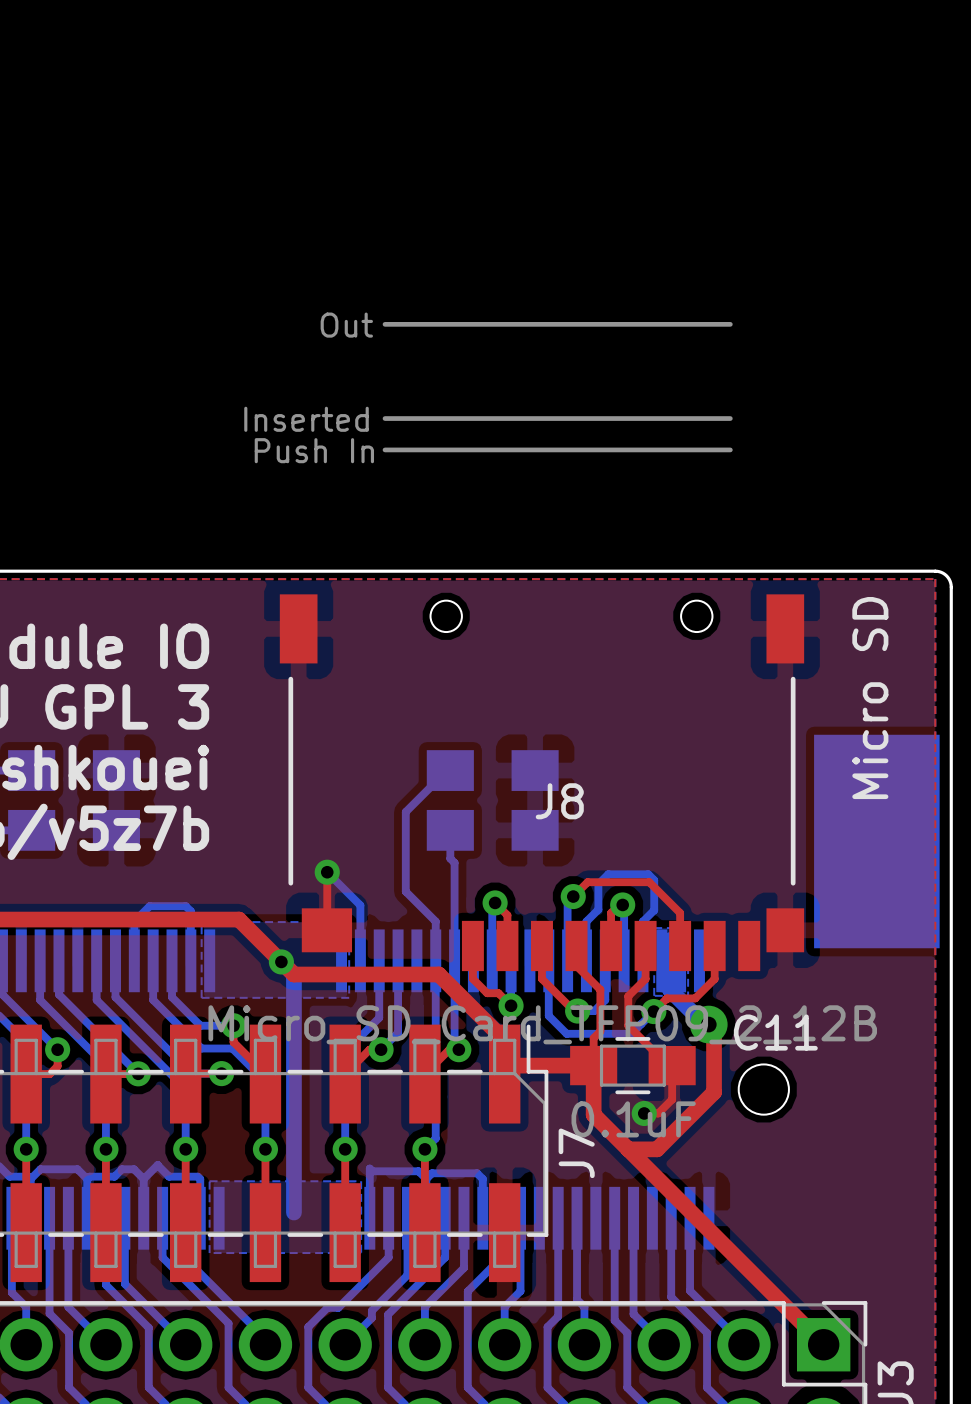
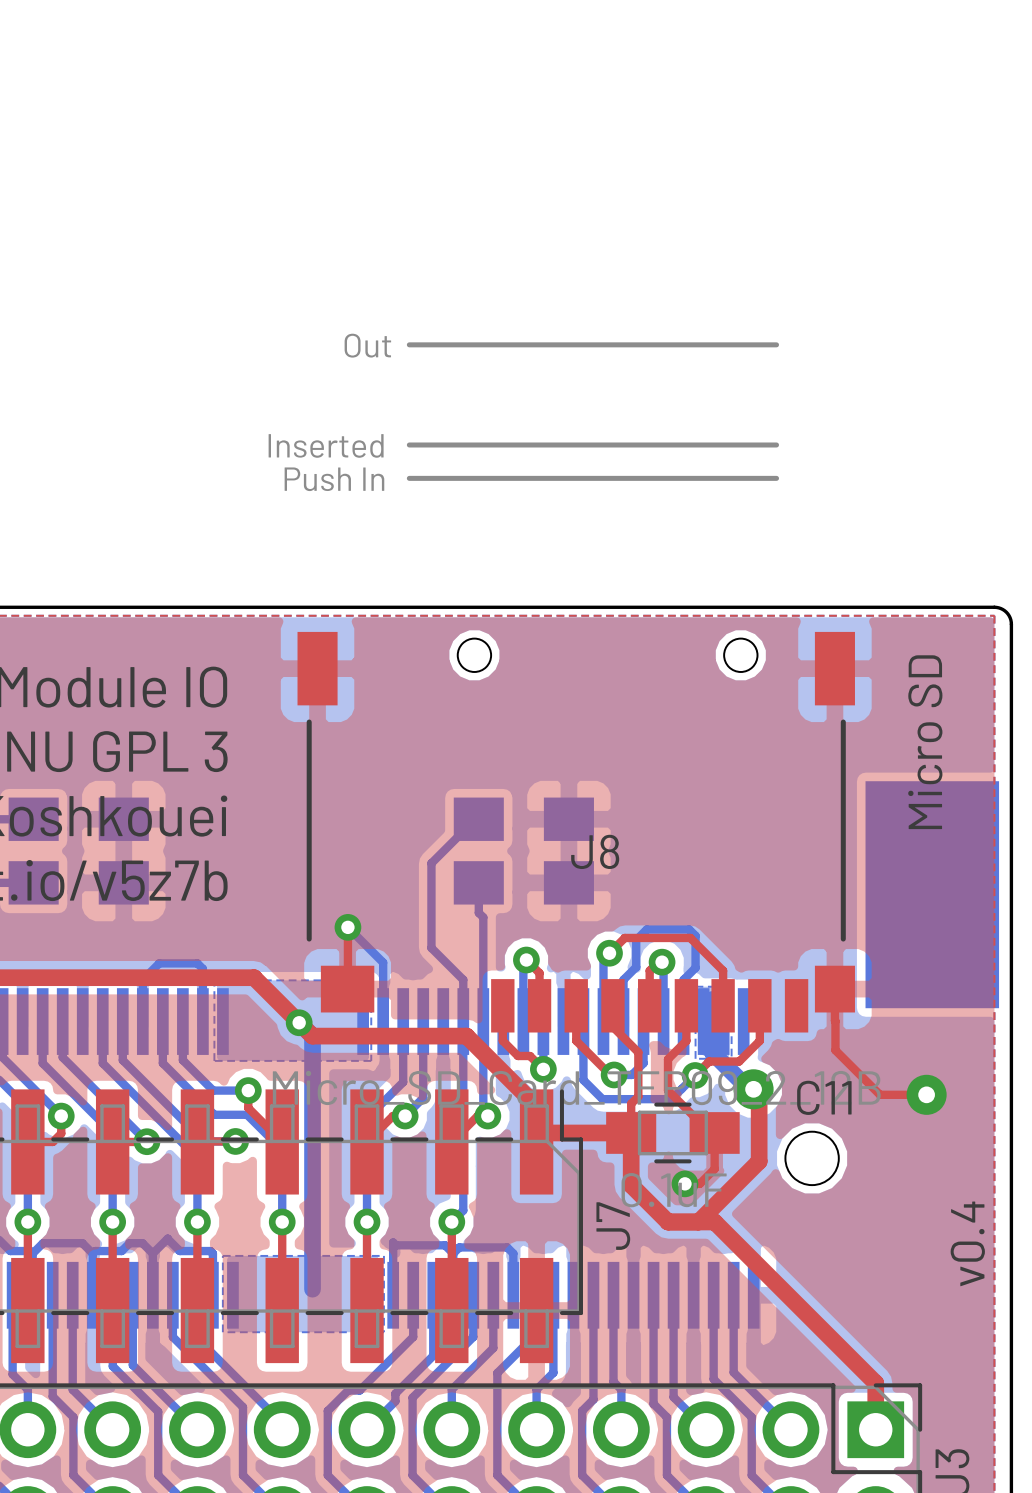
top track: none -> (834, 989) (835, 1050) (879, 1094) (926, 1094)
via: none -> (926, 1094)
top track: (628, 1149) (823, 1344) -> (698, 1222) (714, 1222) (875, 1383) (875, 1429)
text: none -> v0.4 (967, 1243)

